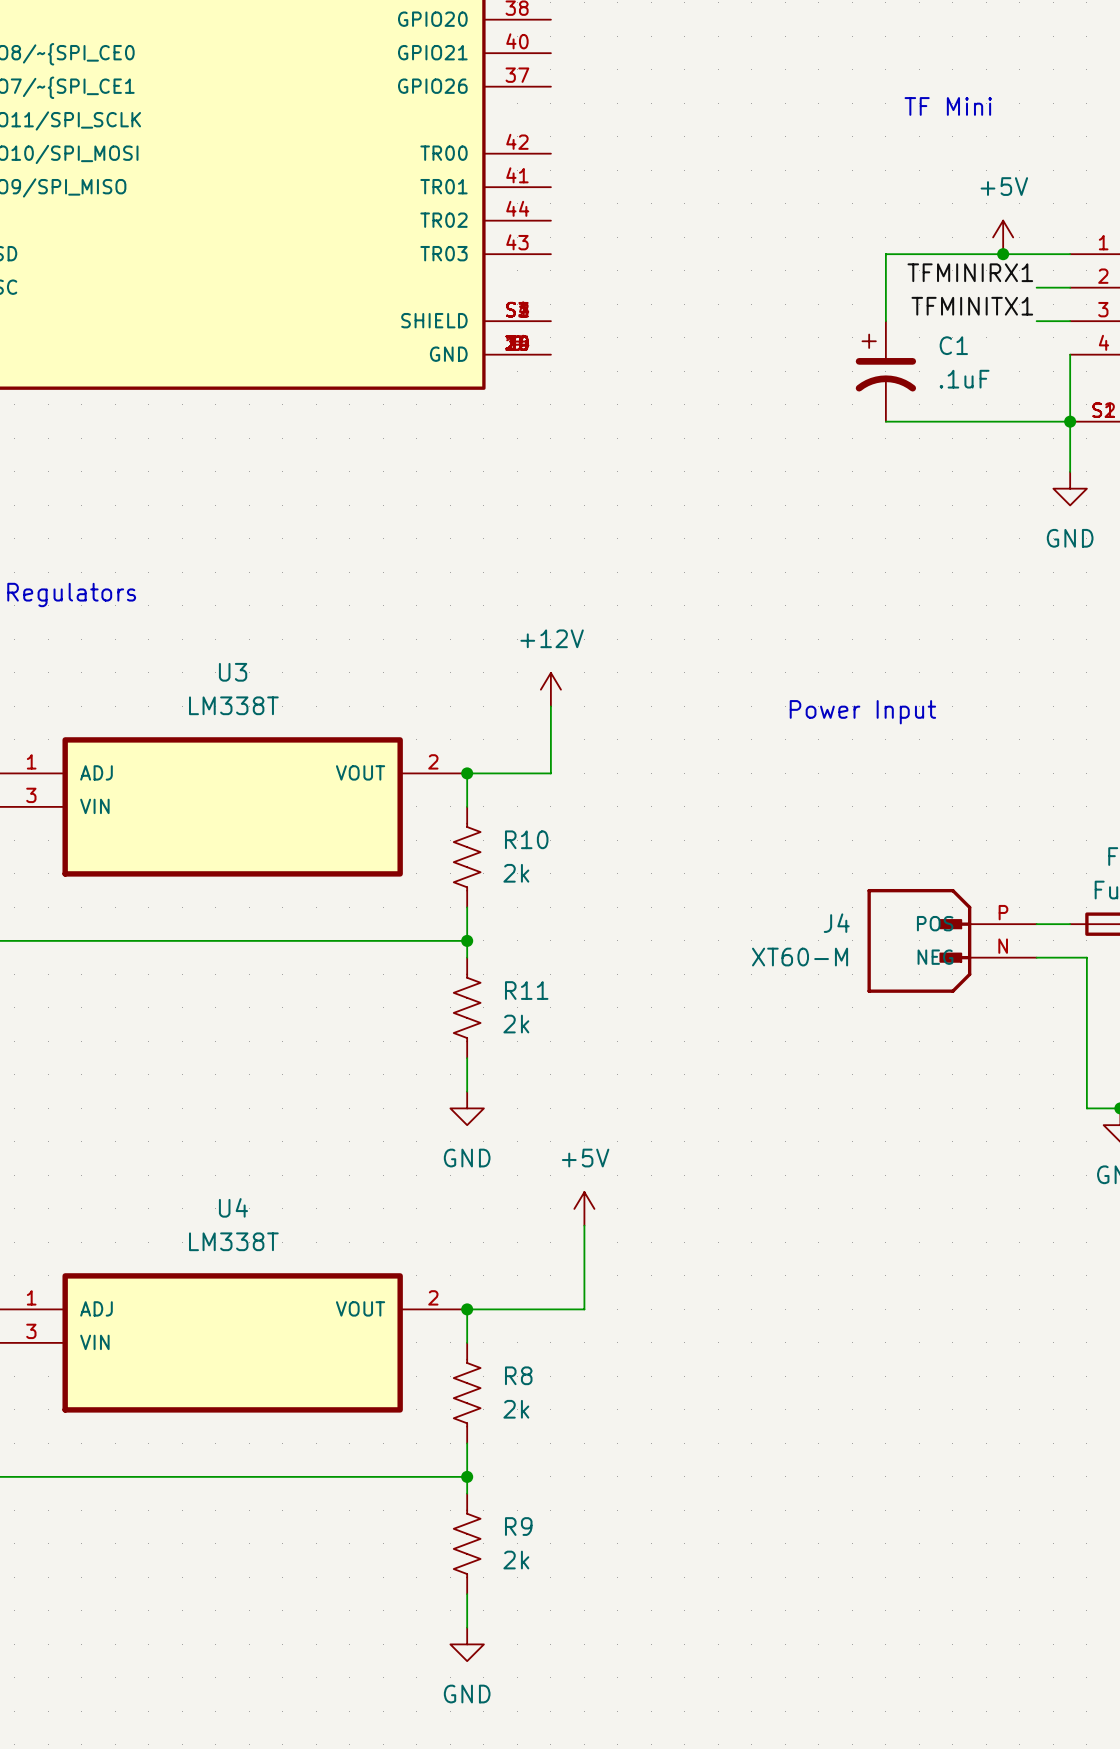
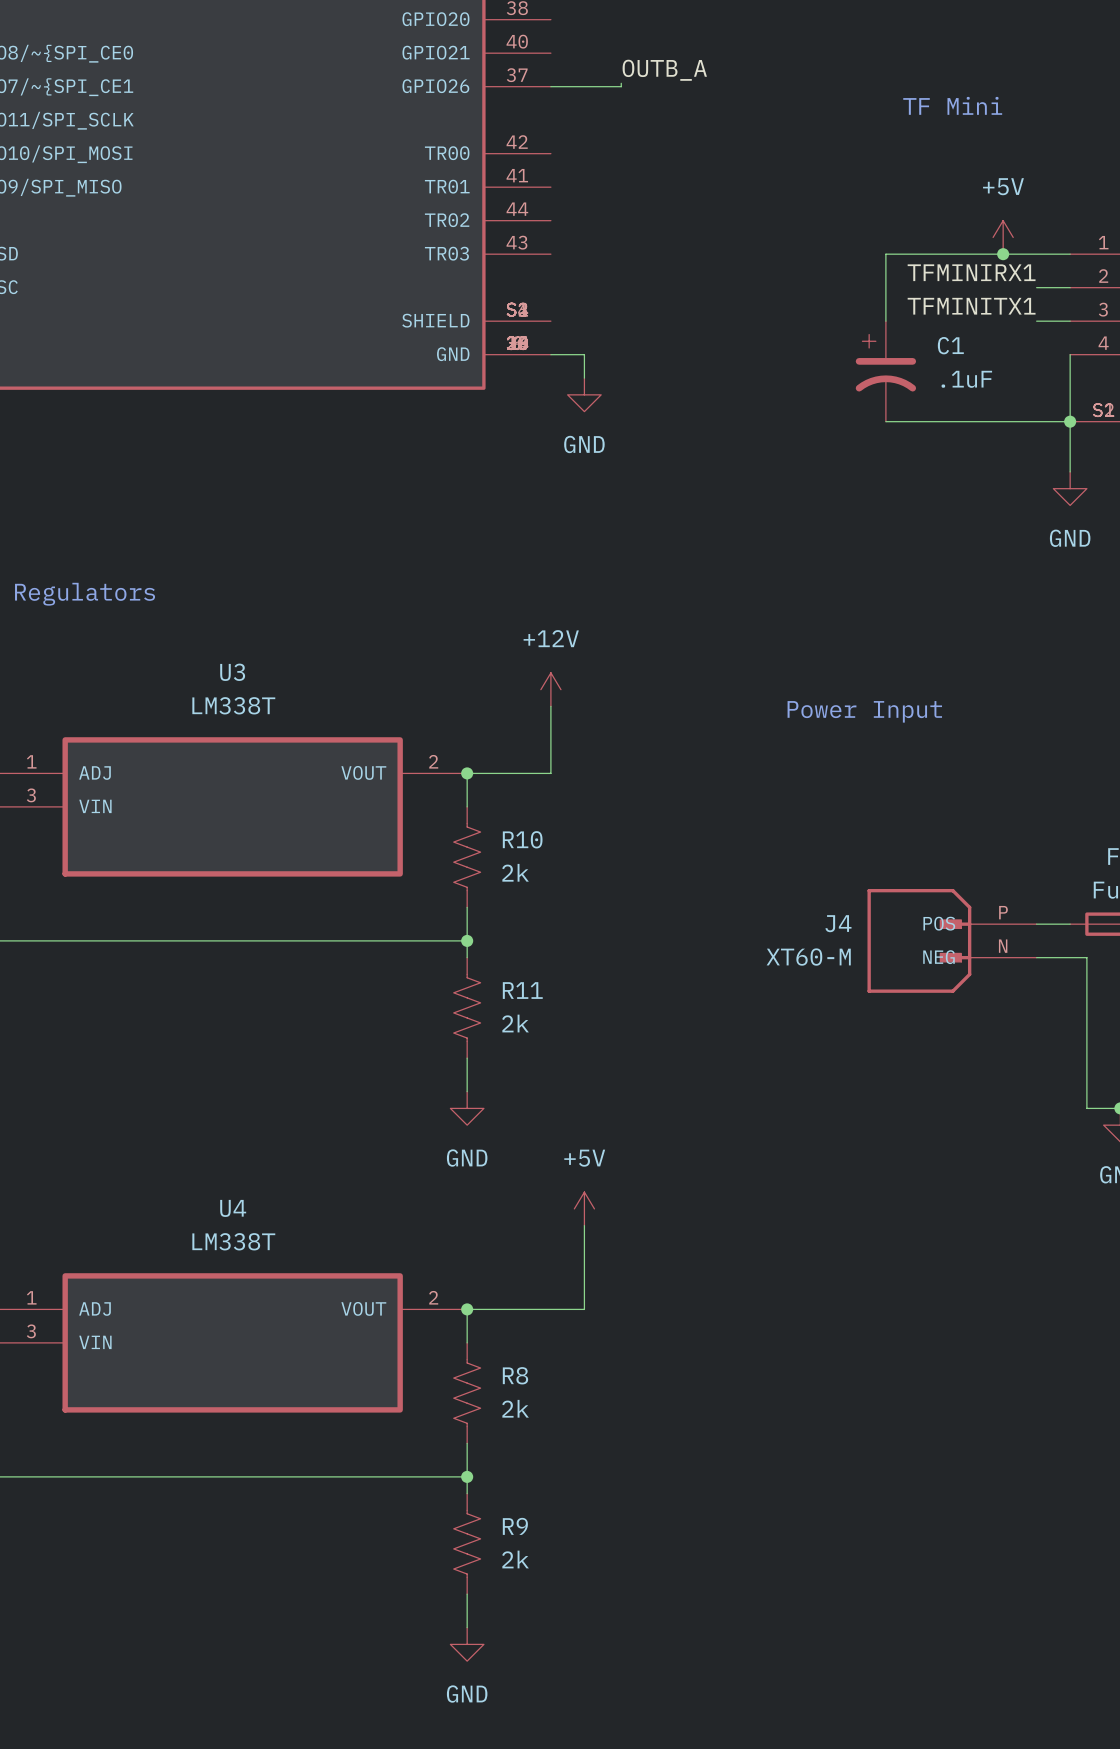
label: none -> OUTB_A (664, 70)
wire: none -> (621, 83) (621, 86) (550, 86)
wire: none -> (550, 354) (584, 354) (584, 378)
power symbol: none -> GND (584, 394)

